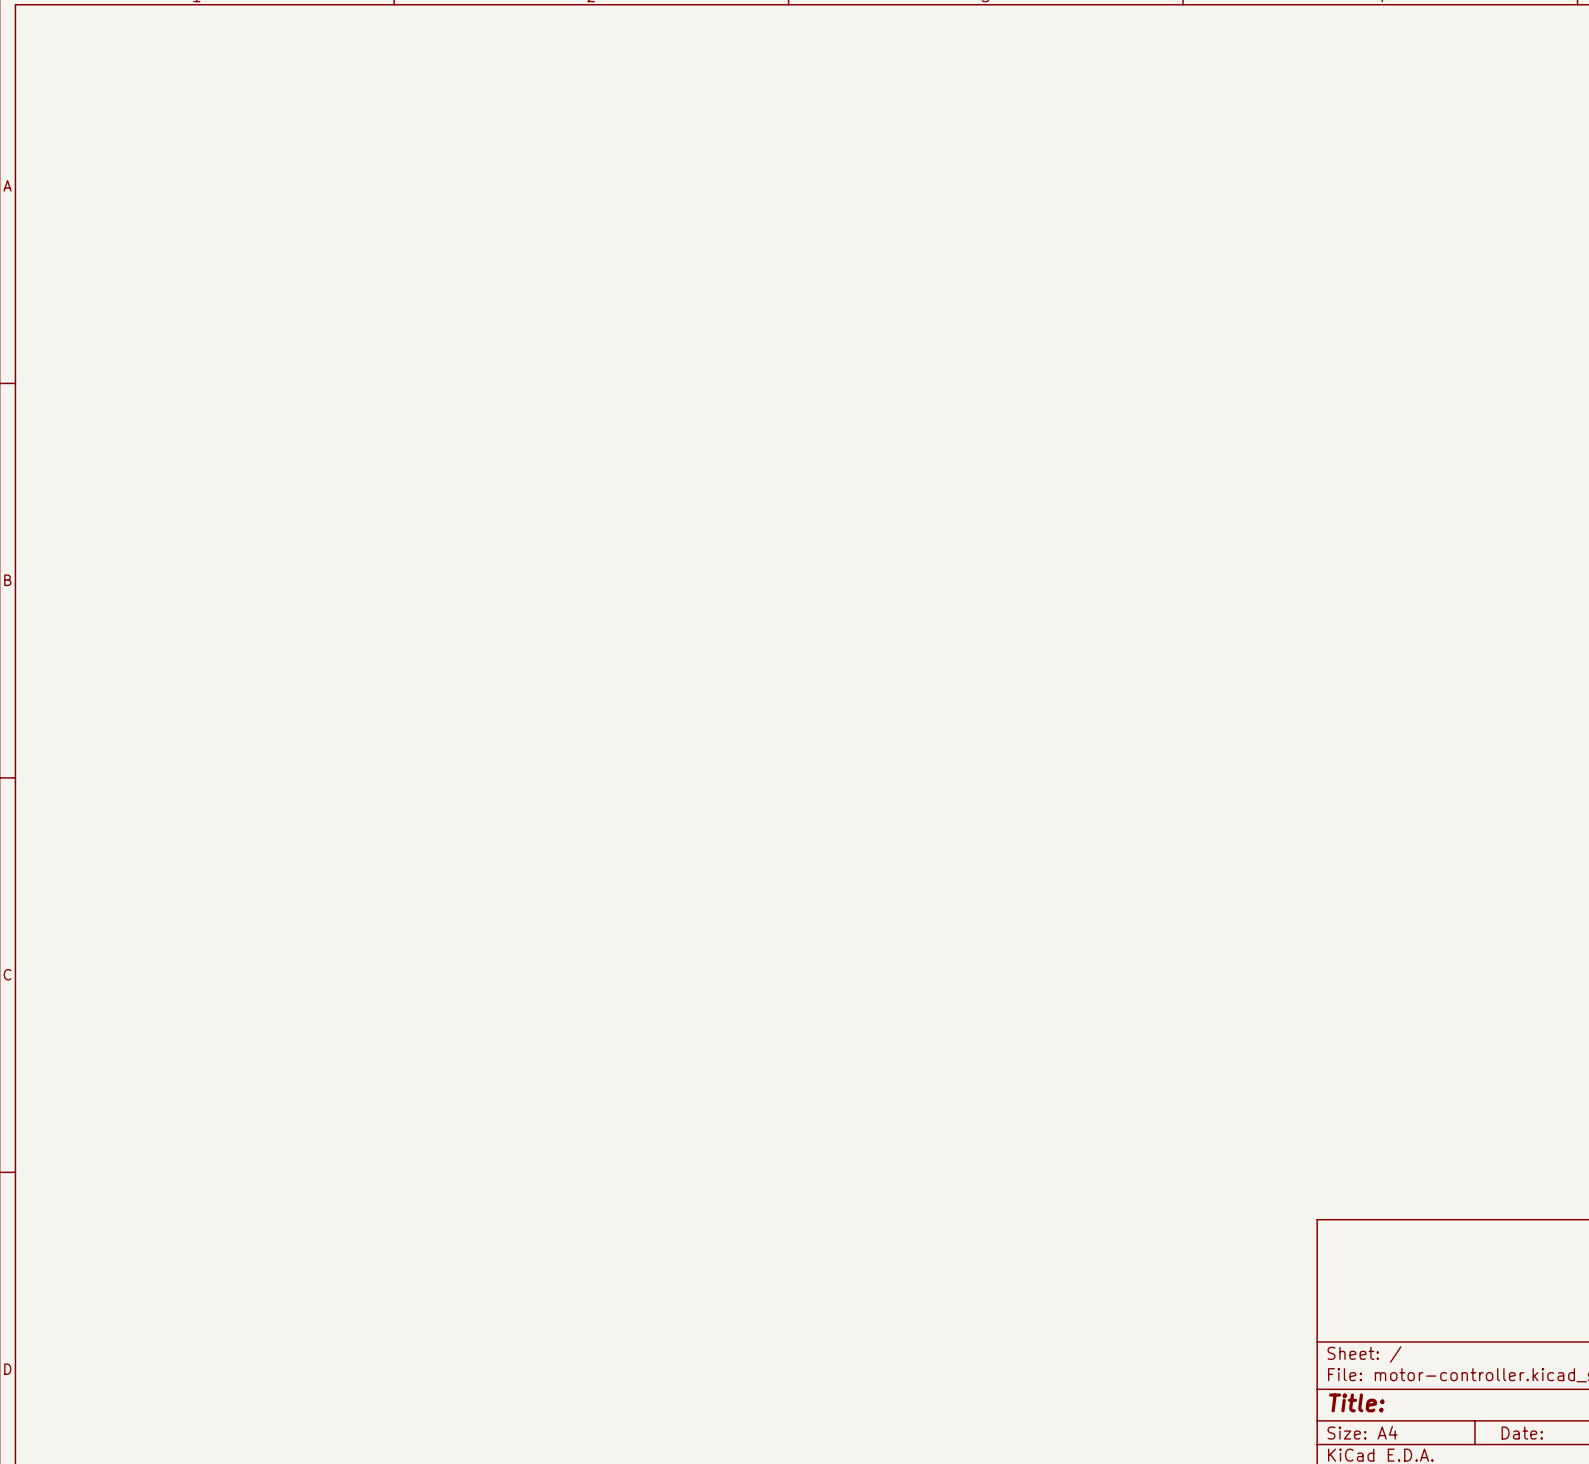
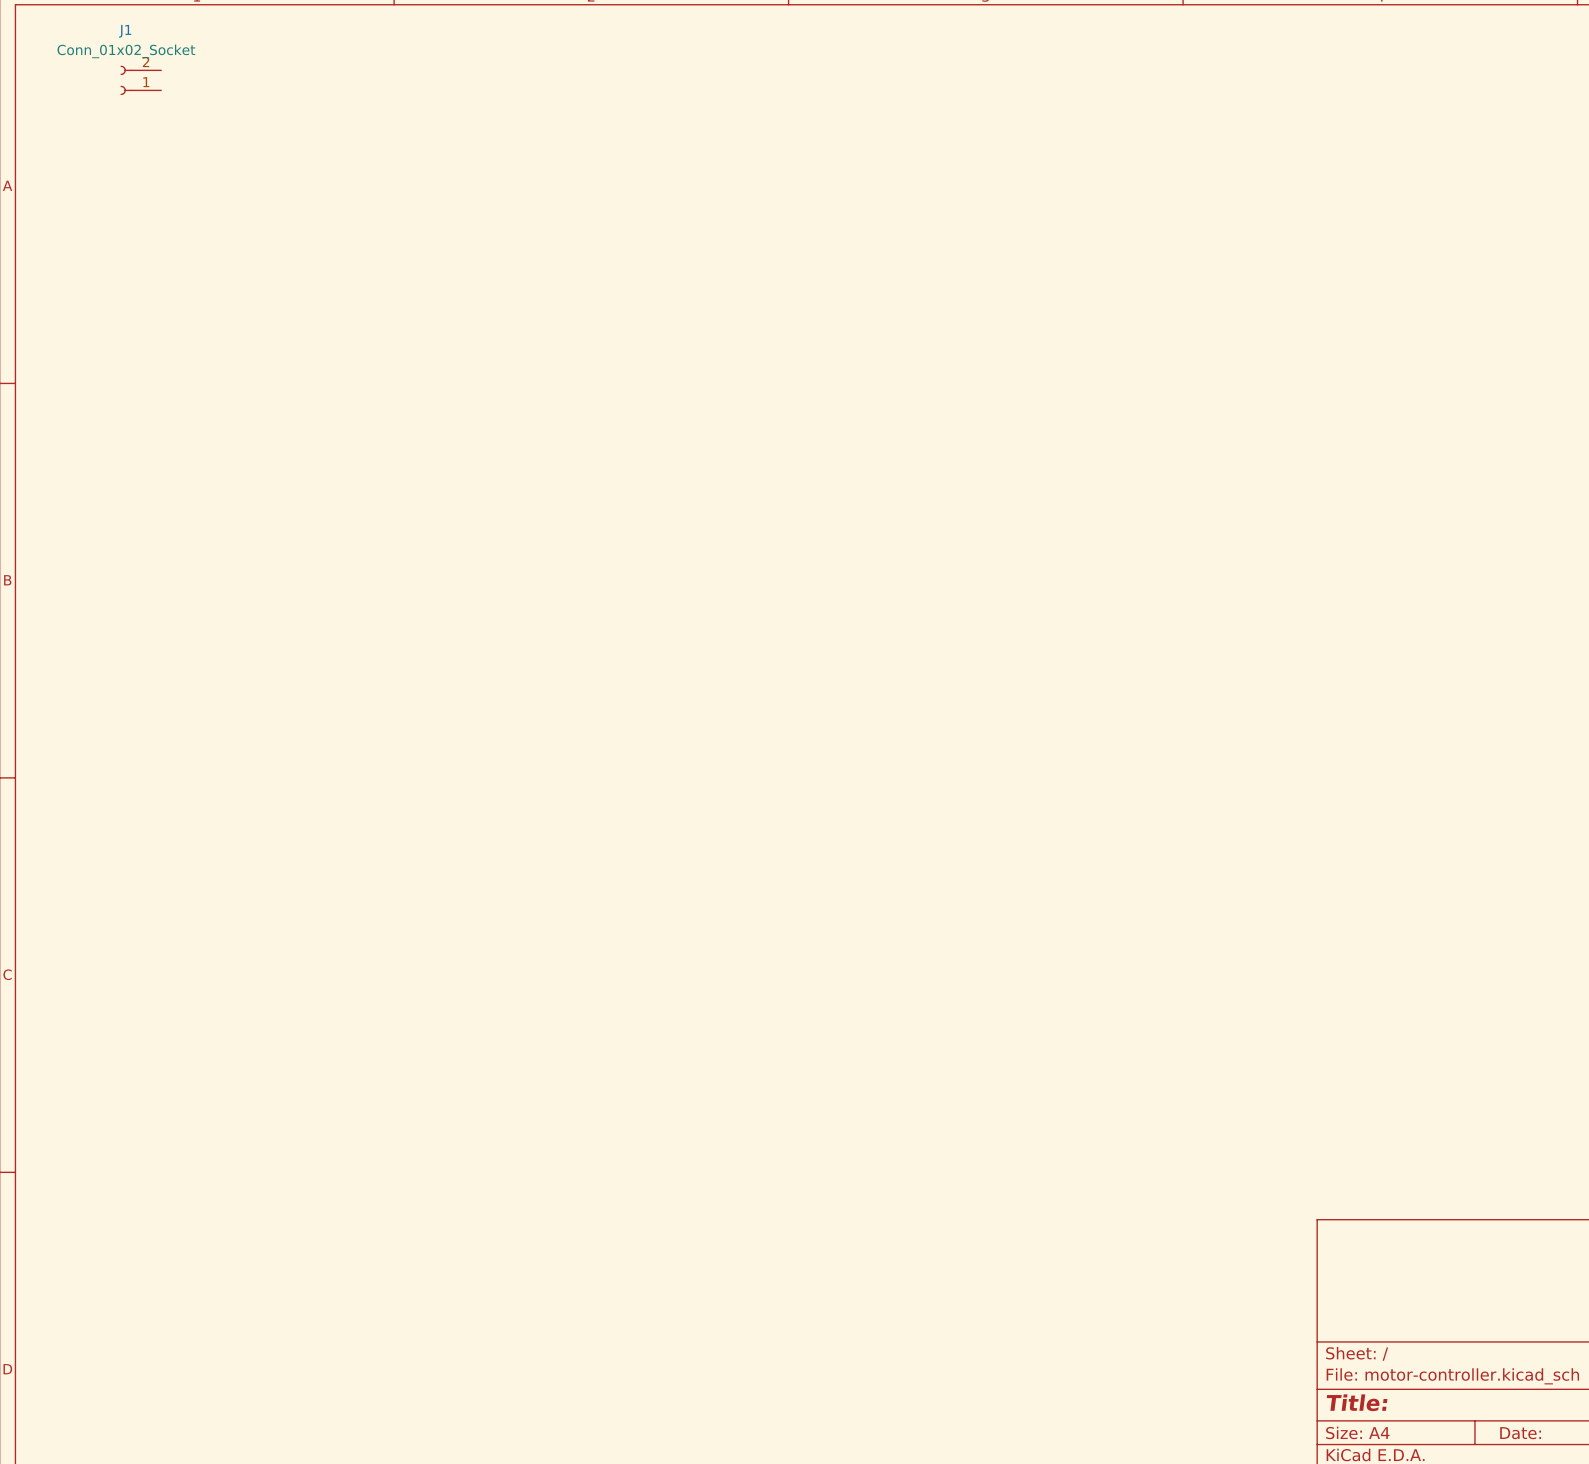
J1: none -> Conn_01x02_Socket (140, 80)

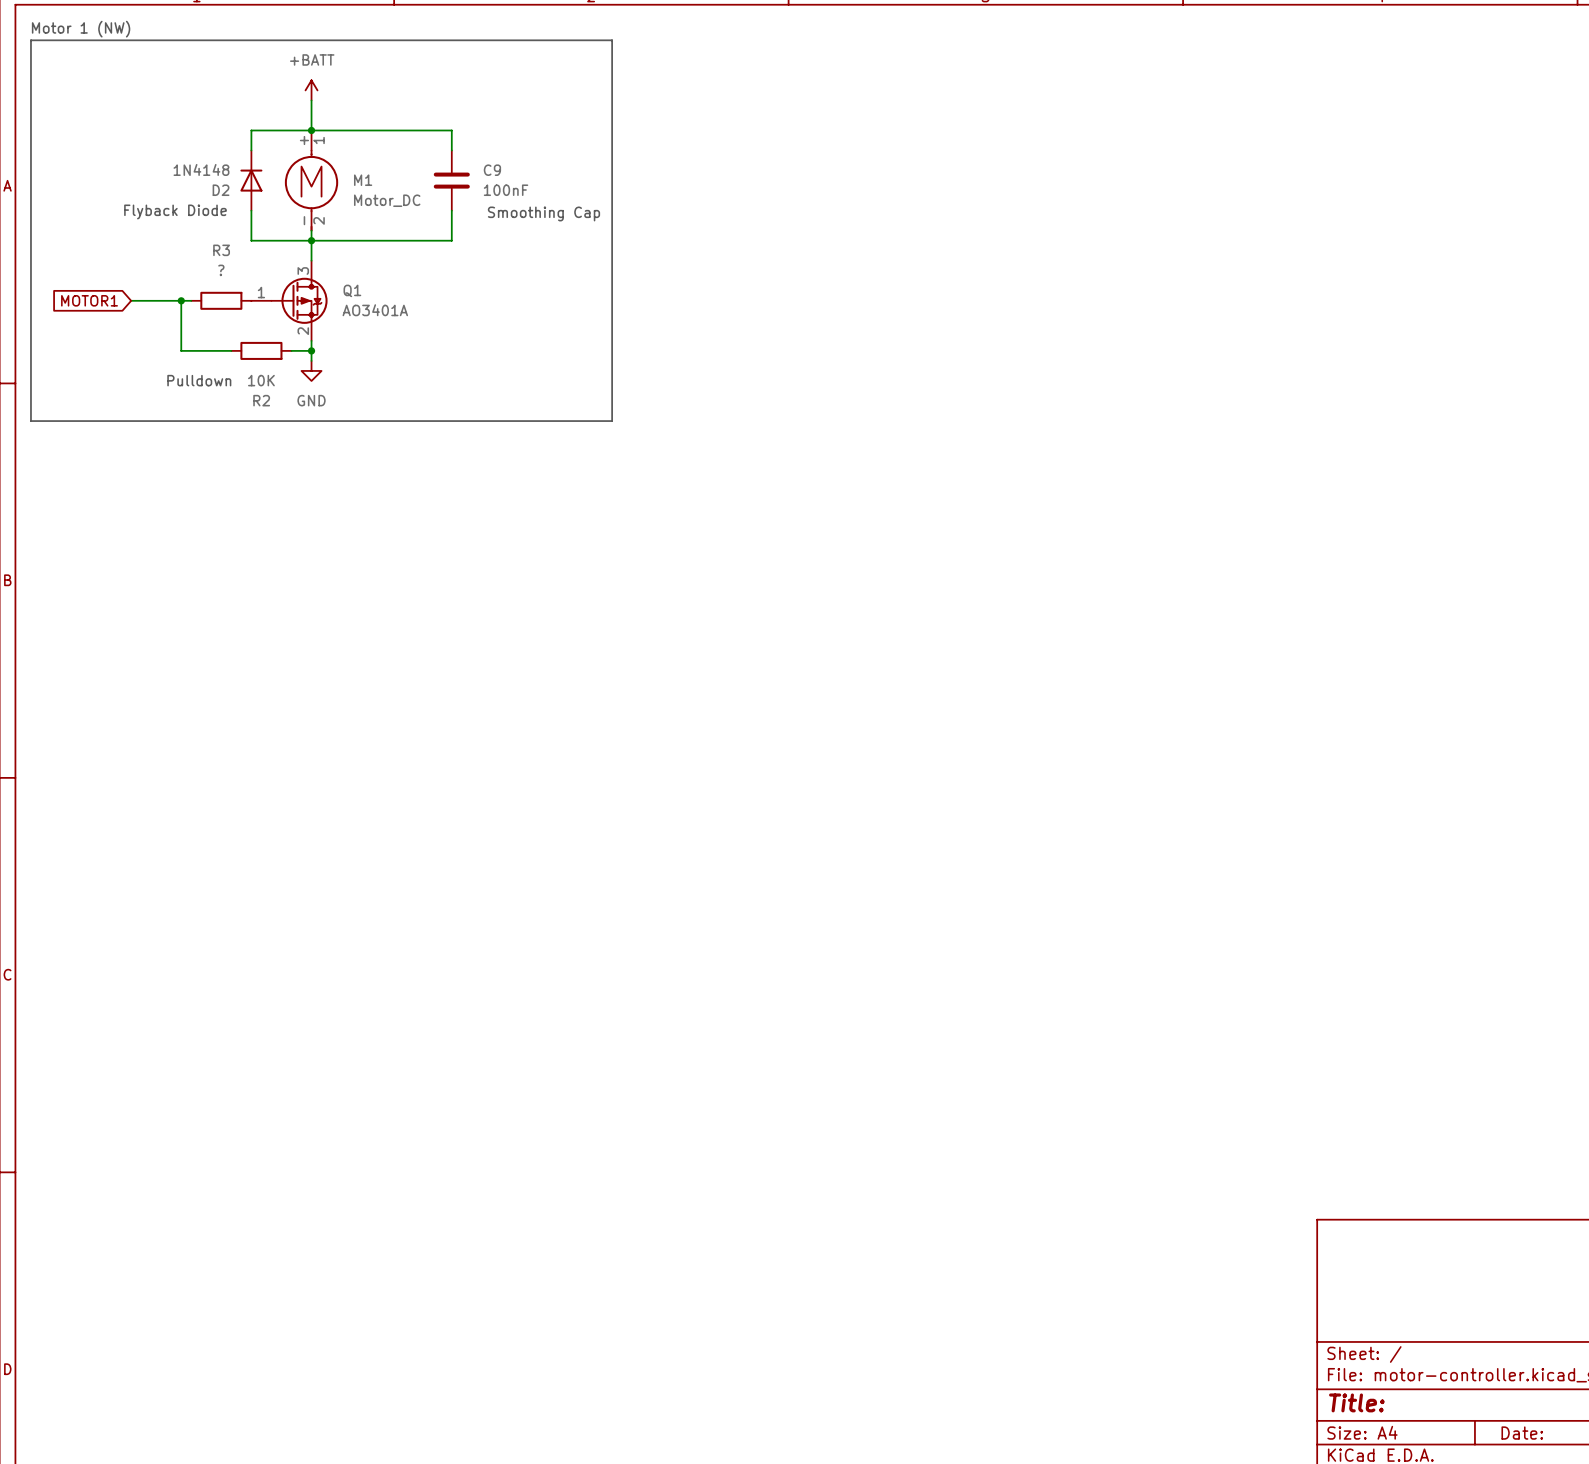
text: none -> Motor 1 (NW) (81, 29)
line: none -> (30, 40) (612, 40) (612, 421) (30, 421) (30, 40)
J1: Conn_01x02_Socket (140, 80) -> none
power symbol: none -> +BATT (311, 90)
wire: none -> (311, 100) (311, 130)
junction: none -> (311, 130)
wire: none -> (251, 150) (251, 130) (451, 130) (451, 150)
D2: none -> 1N4148 (251, 180)
M1: none -> Motor_DC (311, 180)
C9: none -> 100nF (451, 180)
wire: none -> (251, 210) (251, 240) (451, 240) (451, 210)
text: none -> Flyback Diode (175, 211)
text: none -> Smoothing Cap (543, 213)
wire: none -> (311, 230) (311, 260)
junction: none -> (311, 240)
global label: none -> MOTOR1 (89, 300)
wire: none -> (131, 300) (191, 300)
wire: none -> (181, 300) (181, 350) (231, 350)
junction: none -> (181, 300)
R3: none -> ? (221, 300)
Q1: none -> AO3401A (289, 300)
wire: none -> (311, 340) (311, 360)
R2: none -> 10K (261, 350)
wire: none -> (291, 350) (311, 350)
junction: none -> (311, 350)
power symbol: none -> GND (311, 370)
text: none -> Pulldown (199, 380)

